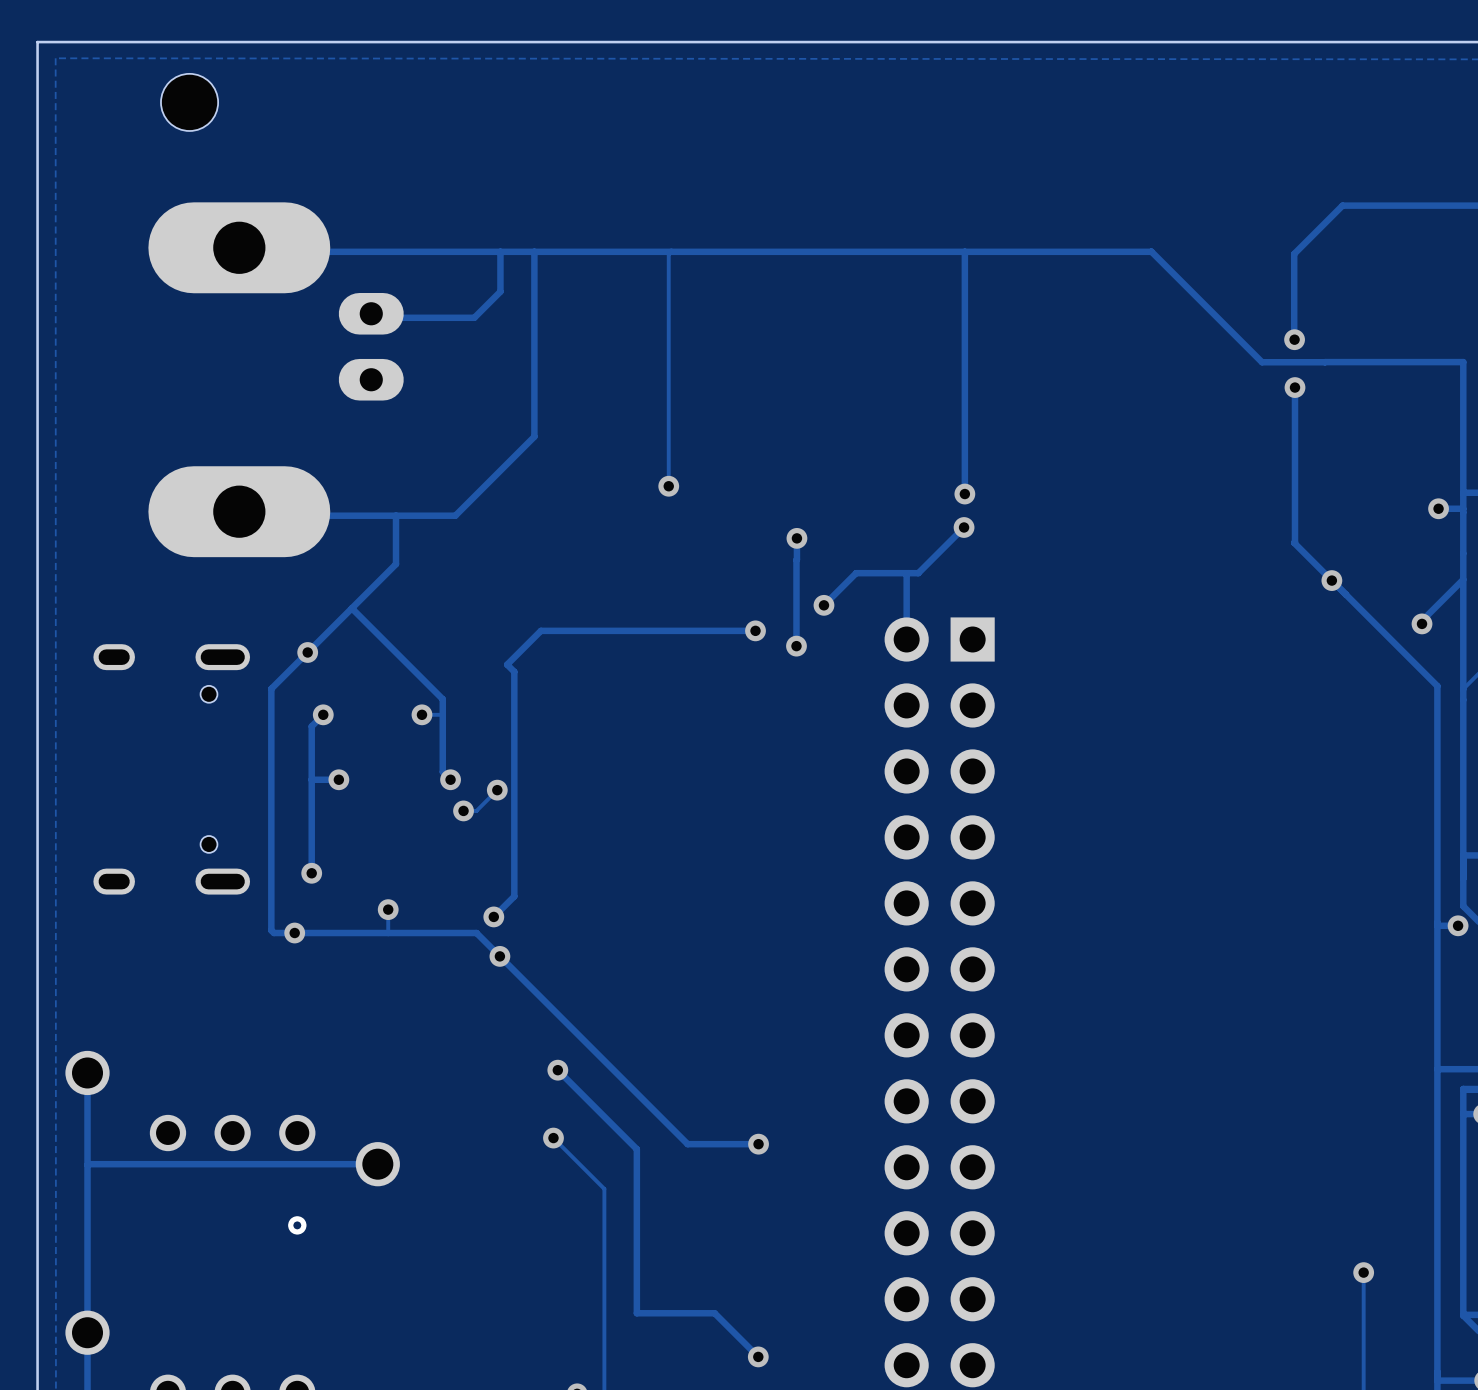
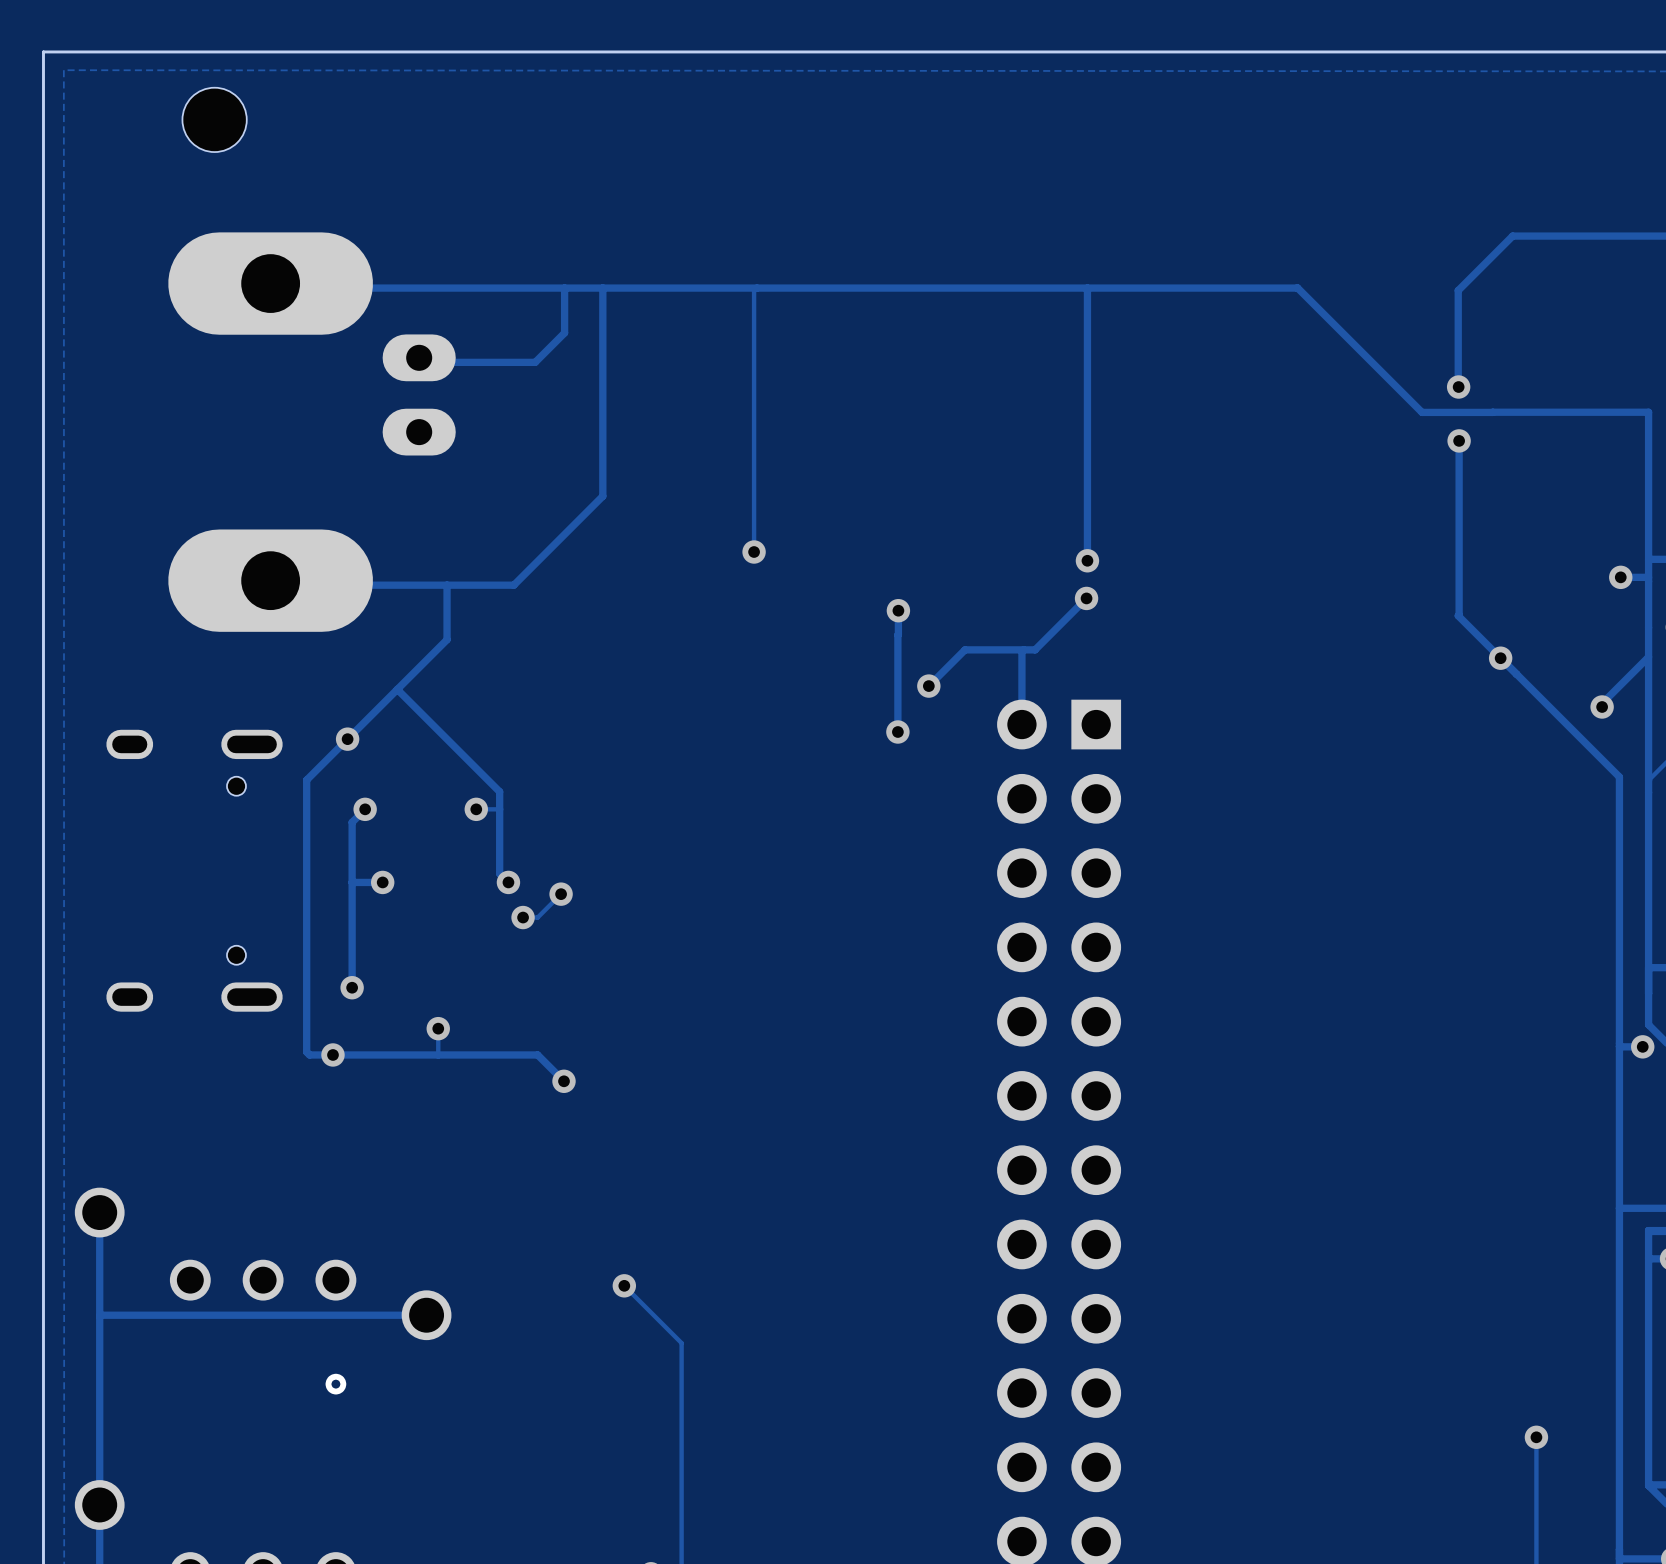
track: (755, 630) (540, 630) (507, 664) (514, 671) (514, 896) (493, 916) -> none
via: (755, 630) -> none
via: (493, 916) -> none
track: (499, 956) (687, 1144) (758, 1144) -> none
track: (557, 1070) (636, 1149) (636, 1313) (714, 1313) (758, 1356) -> none
via: (557, 1070) -> none
via: (758, 1144) -> none
via: (758, 1356) -> none

